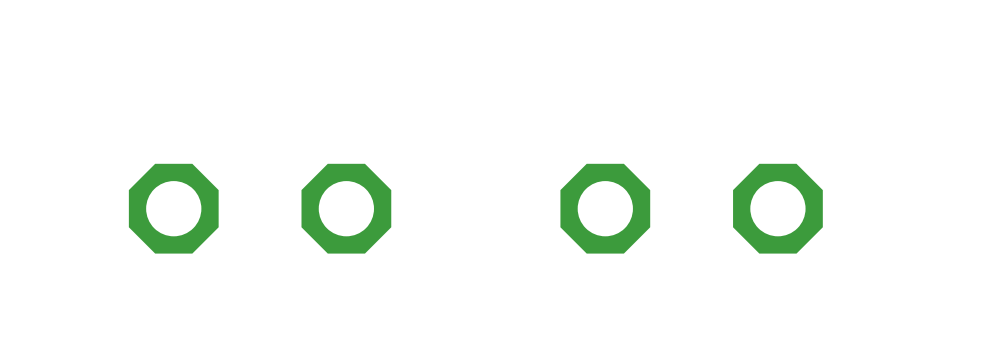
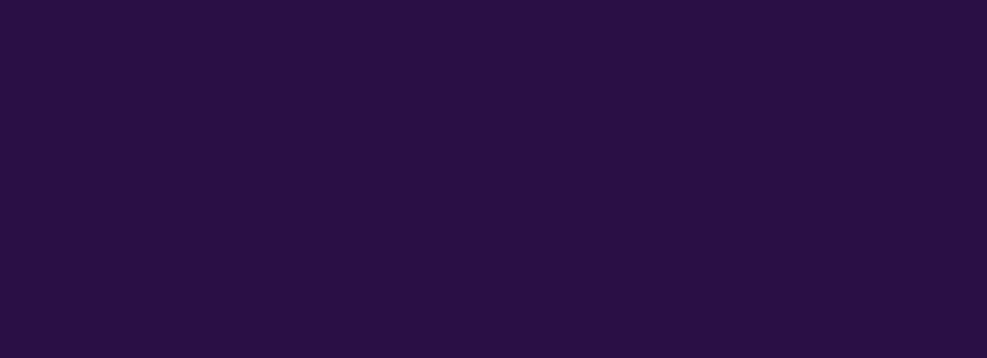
part: (260, 208) -> none
part: (691, 208) -> none

